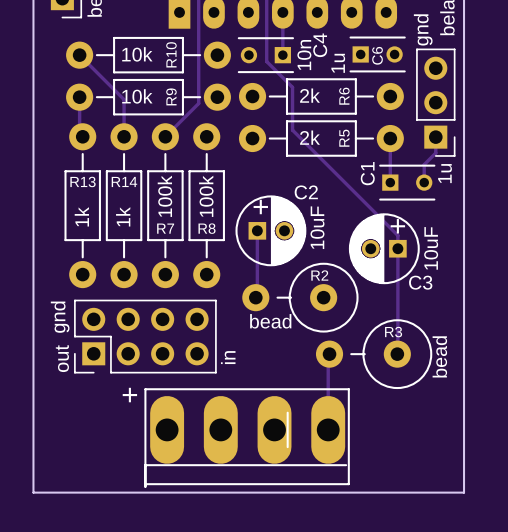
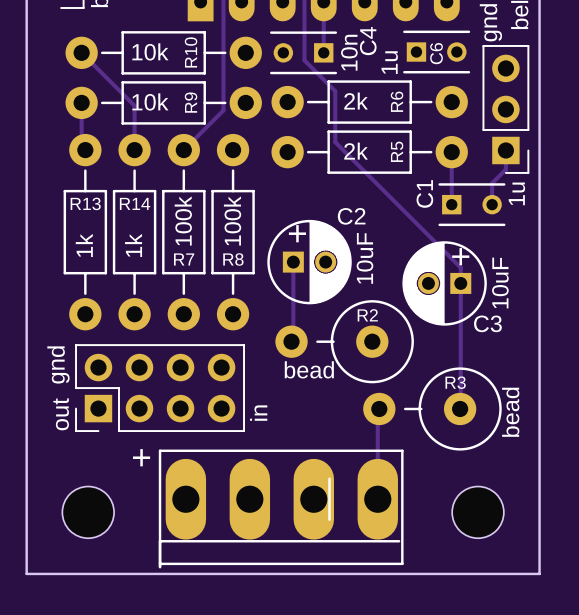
part: none -> (88, 512)
part: none -> (478, 512)

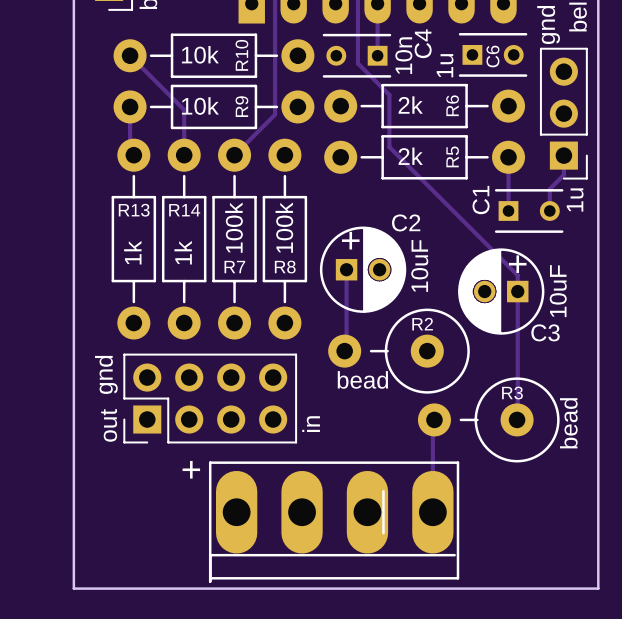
part: (88, 512) -> none
part: (478, 512) -> none

